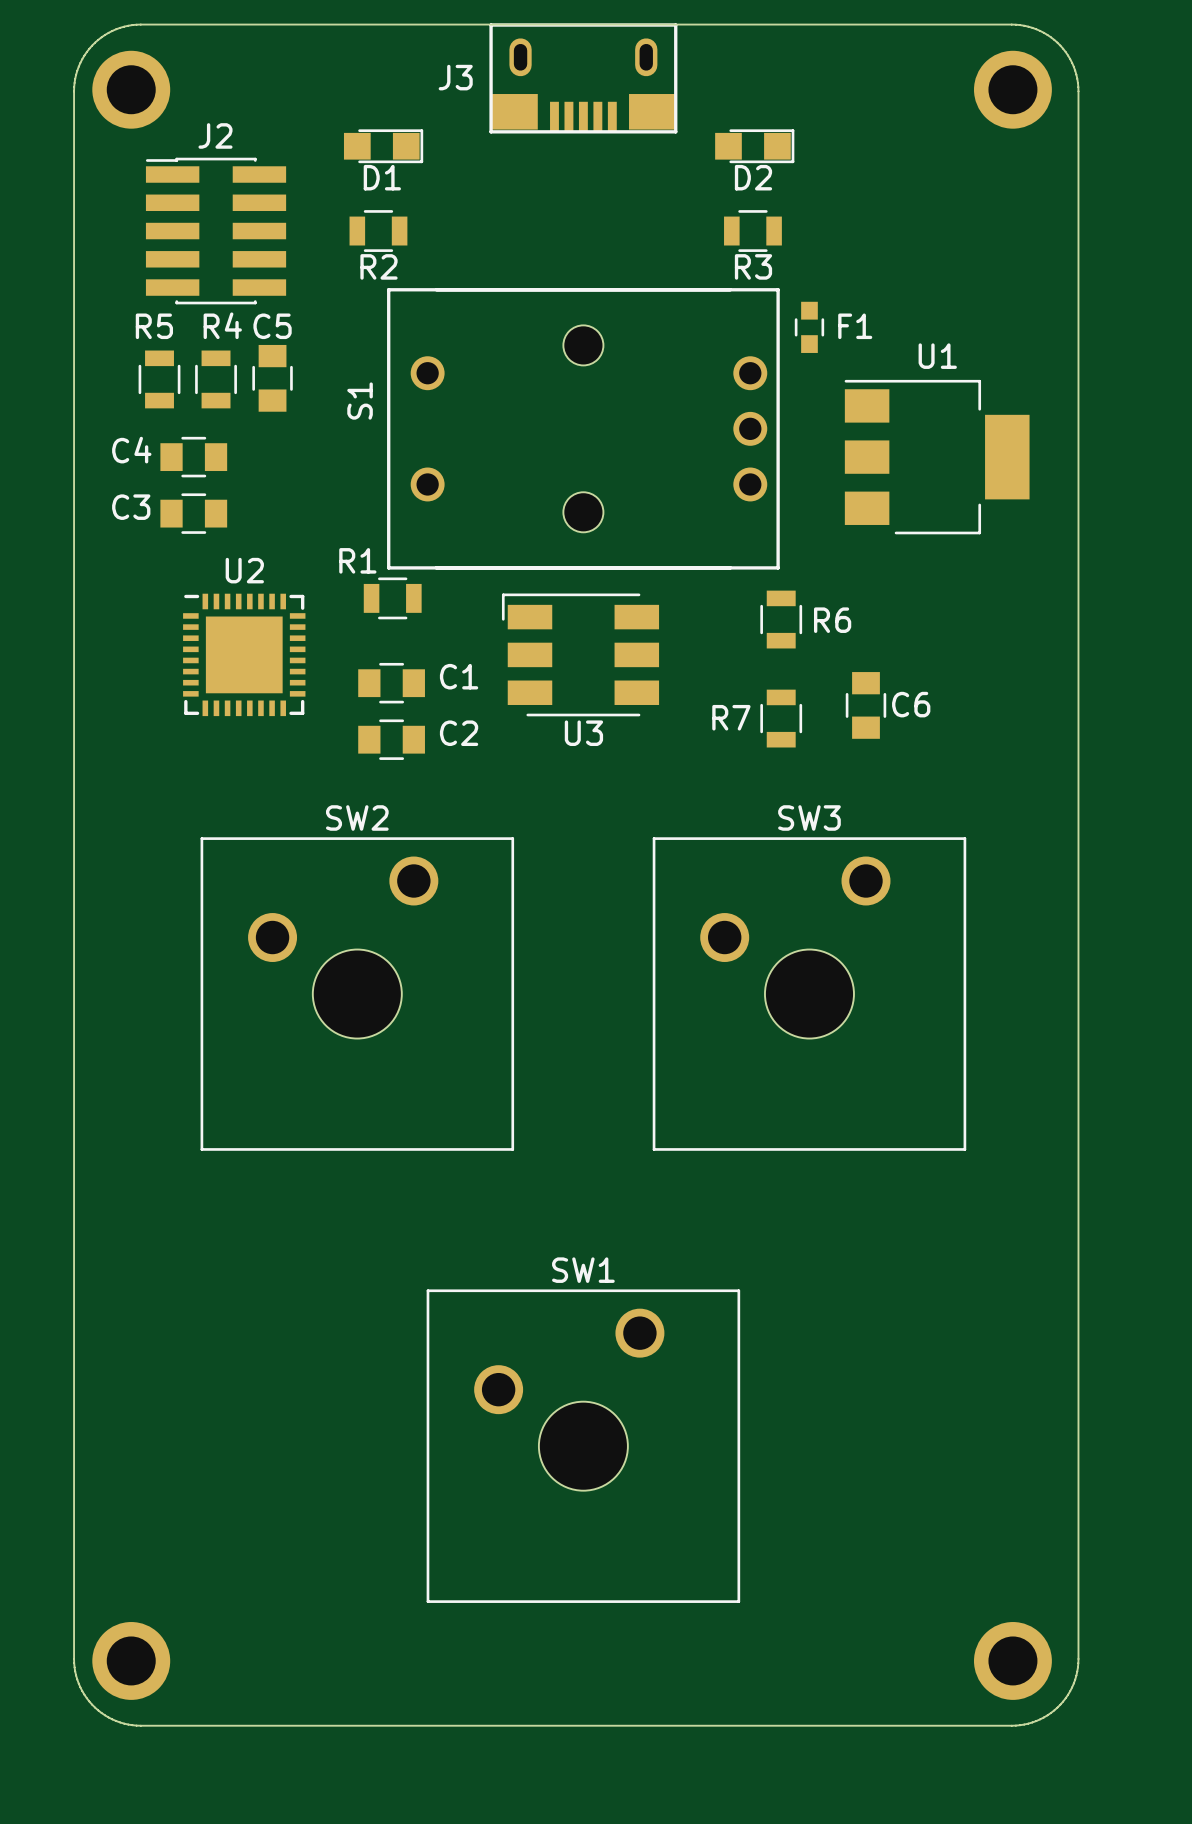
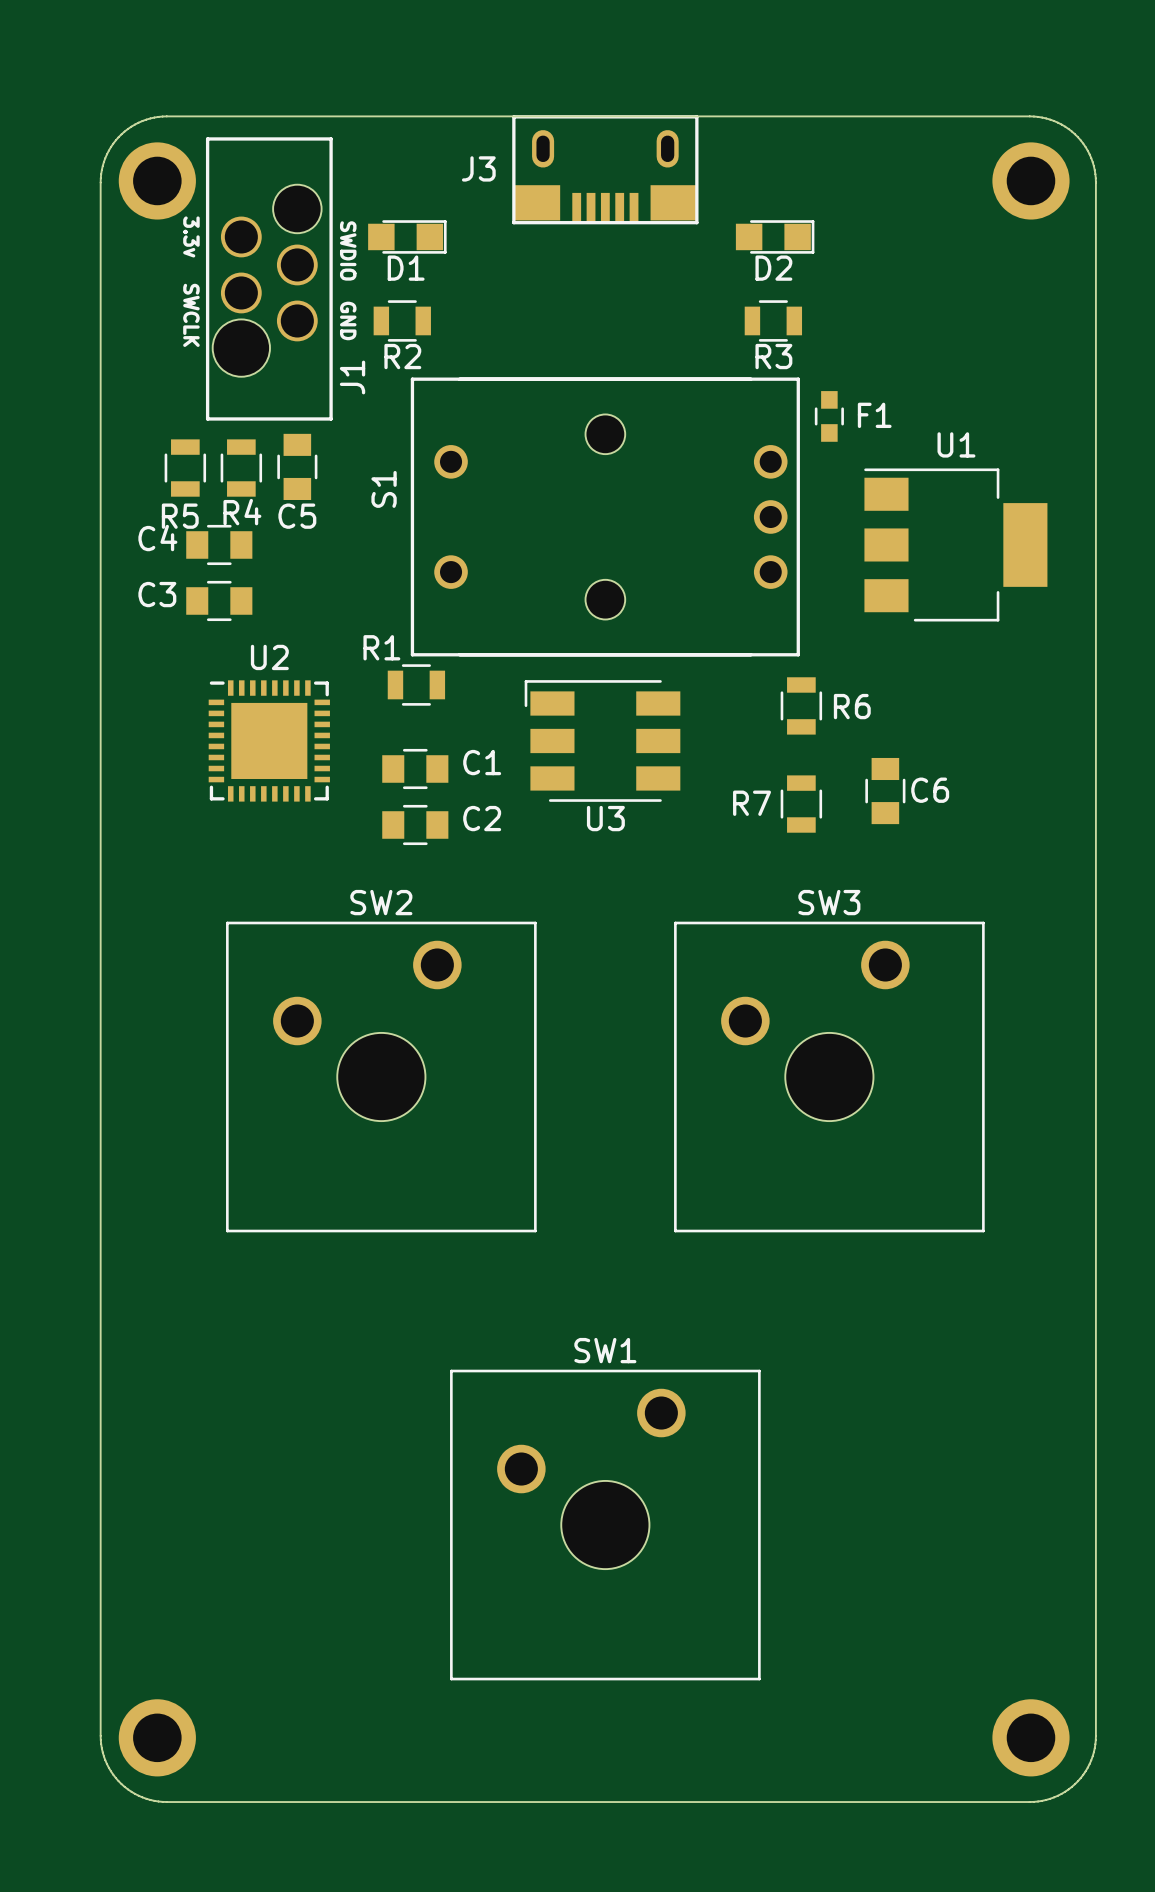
text: none -> 3.3v (191, 236)
text: none -> SWDIO (348, 250)
J1: none -> (269, 278)
text: none -> SWCLK (191, 315)
J2: (216, 231) -> none
text: none -> GND (348, 320)
R4 name position: R4 (222, 325) -> R4 (242, 512)
R5 name position: R5 (154, 326) -> R5 (180, 516)
C5 name position: C5 (272, 326) -> C5 (297, 516)

